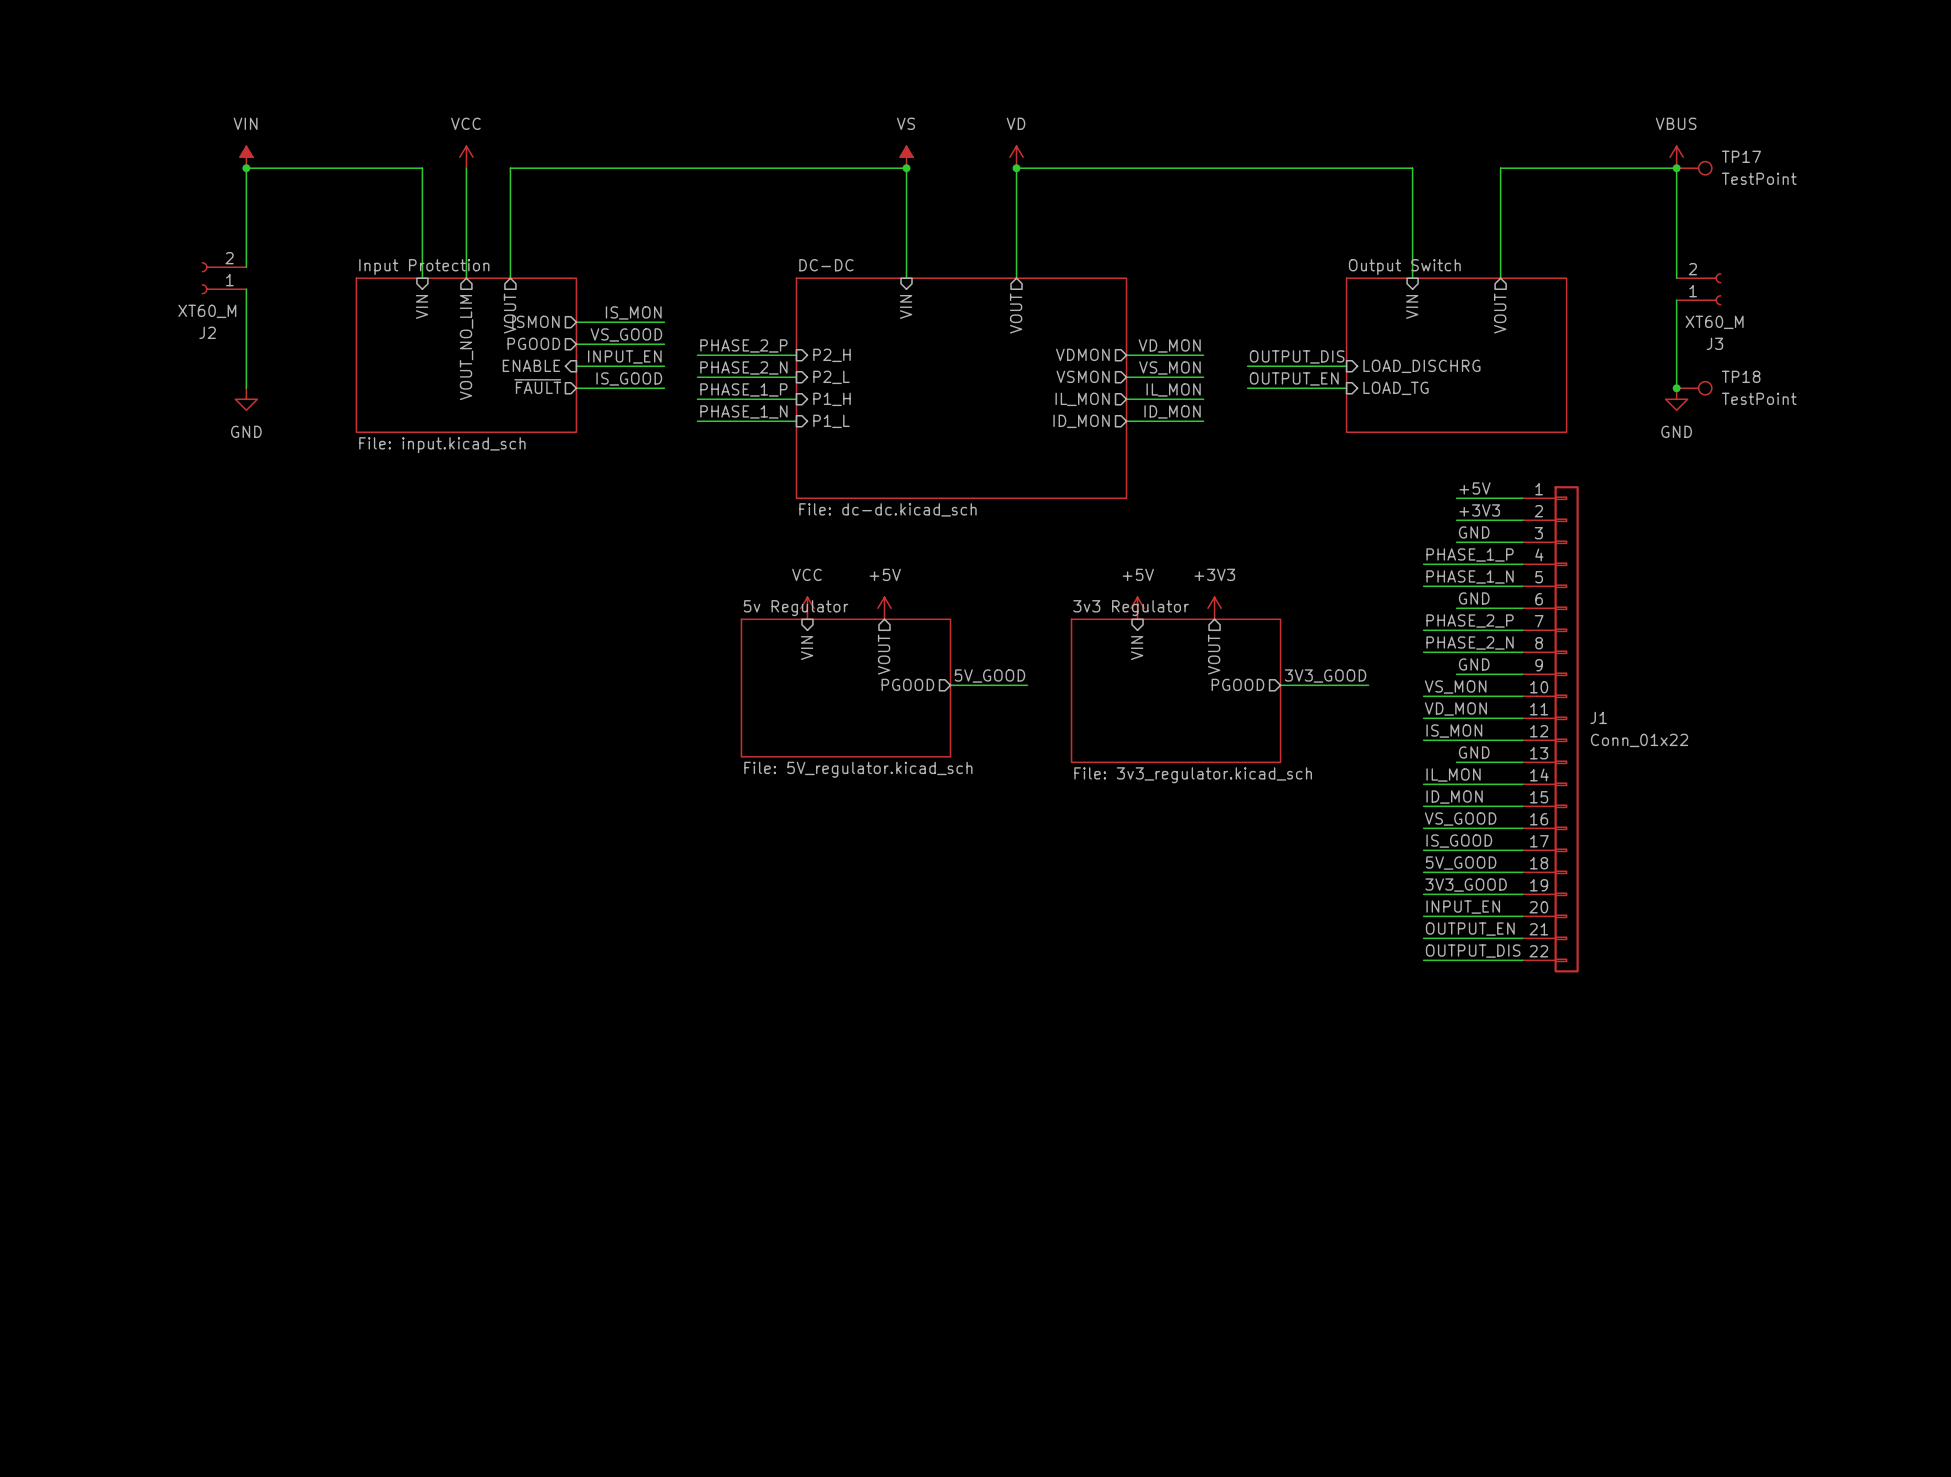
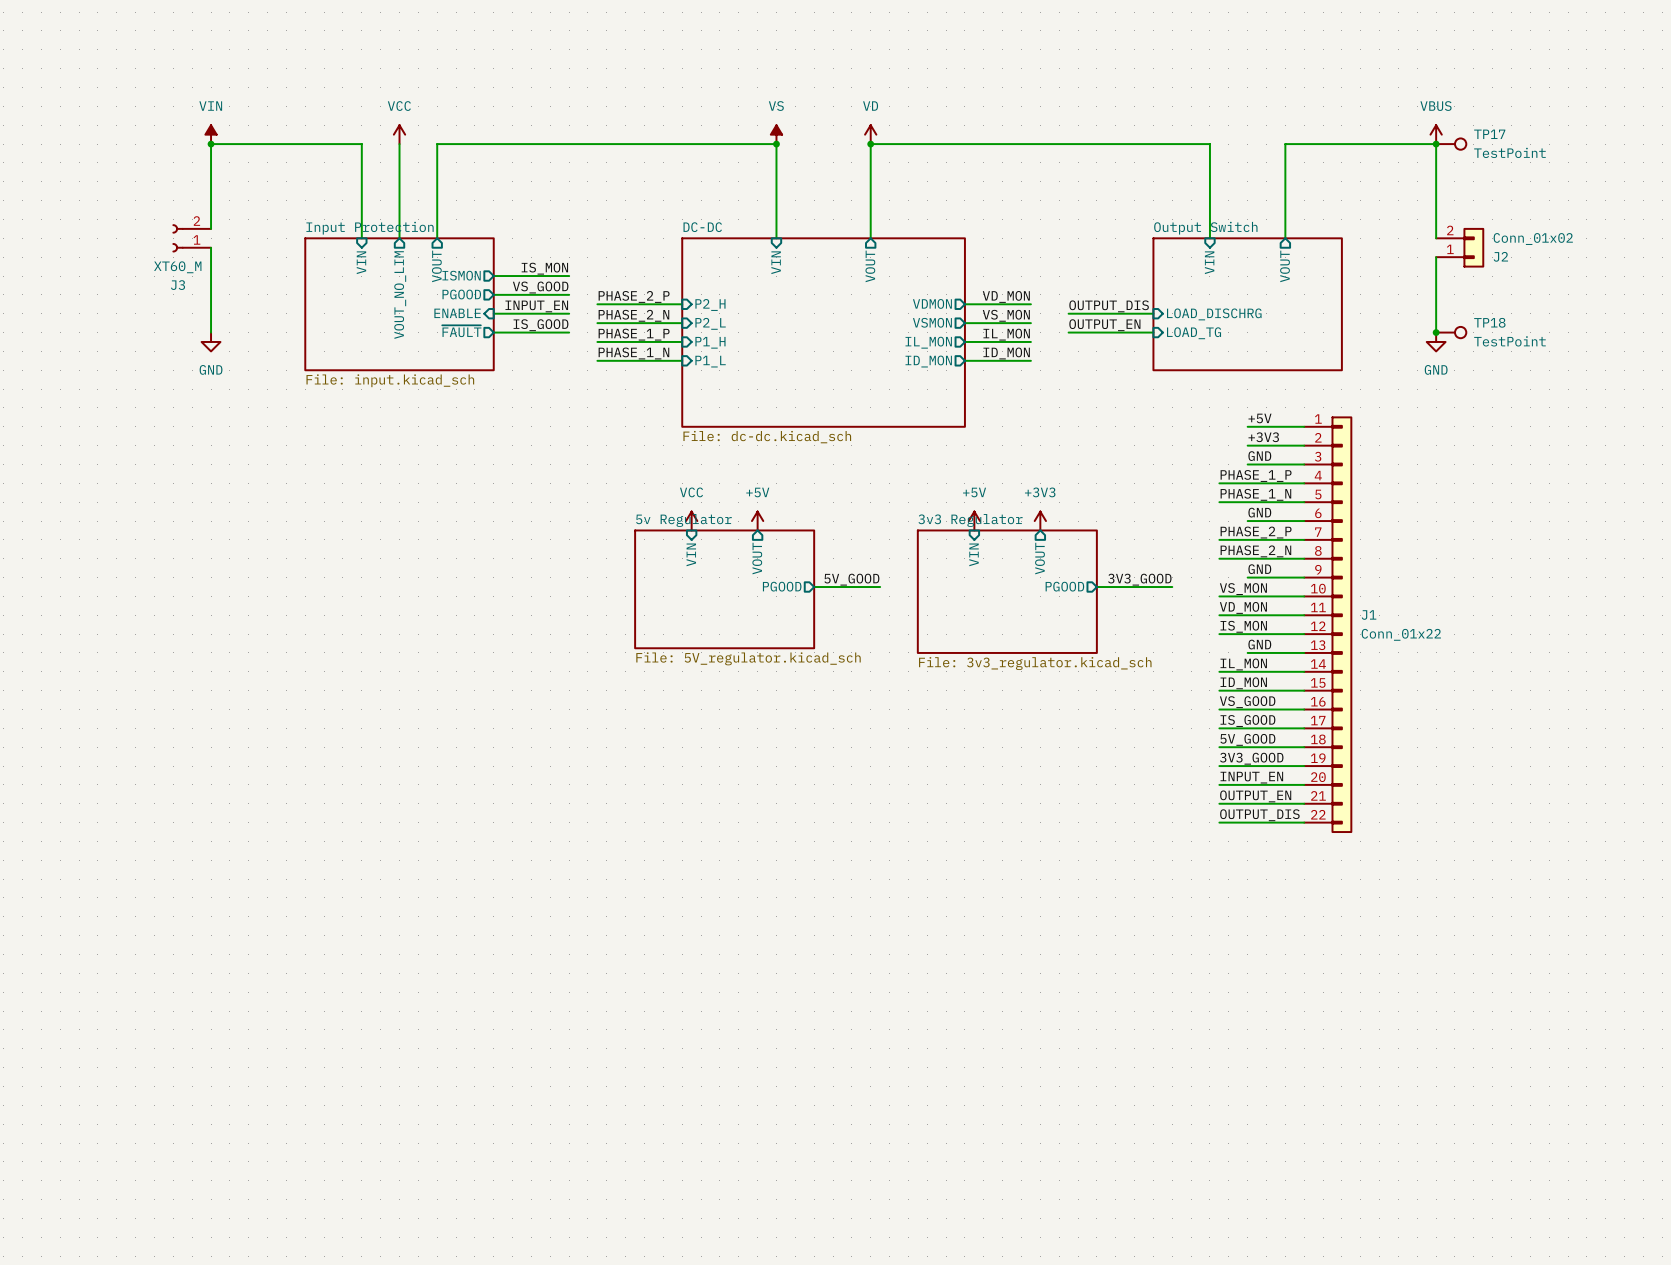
J3: XT60_M (1698, 289) -> none
J2: none -> Conn_01x02 (1460, 247)
J2 name: J2 (207, 332) -> J3 (178, 285)

